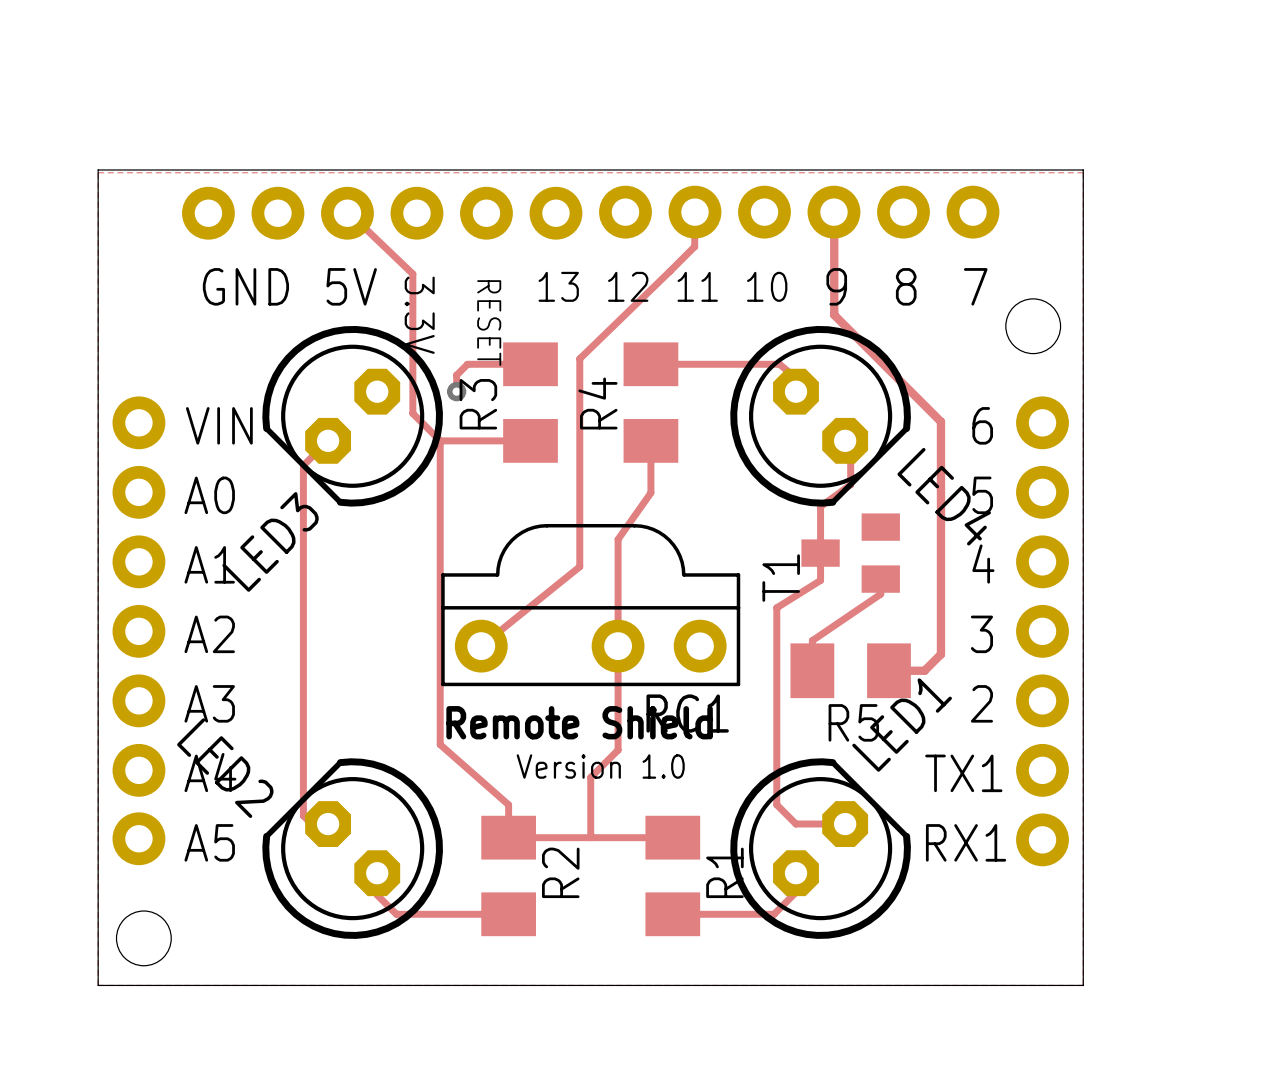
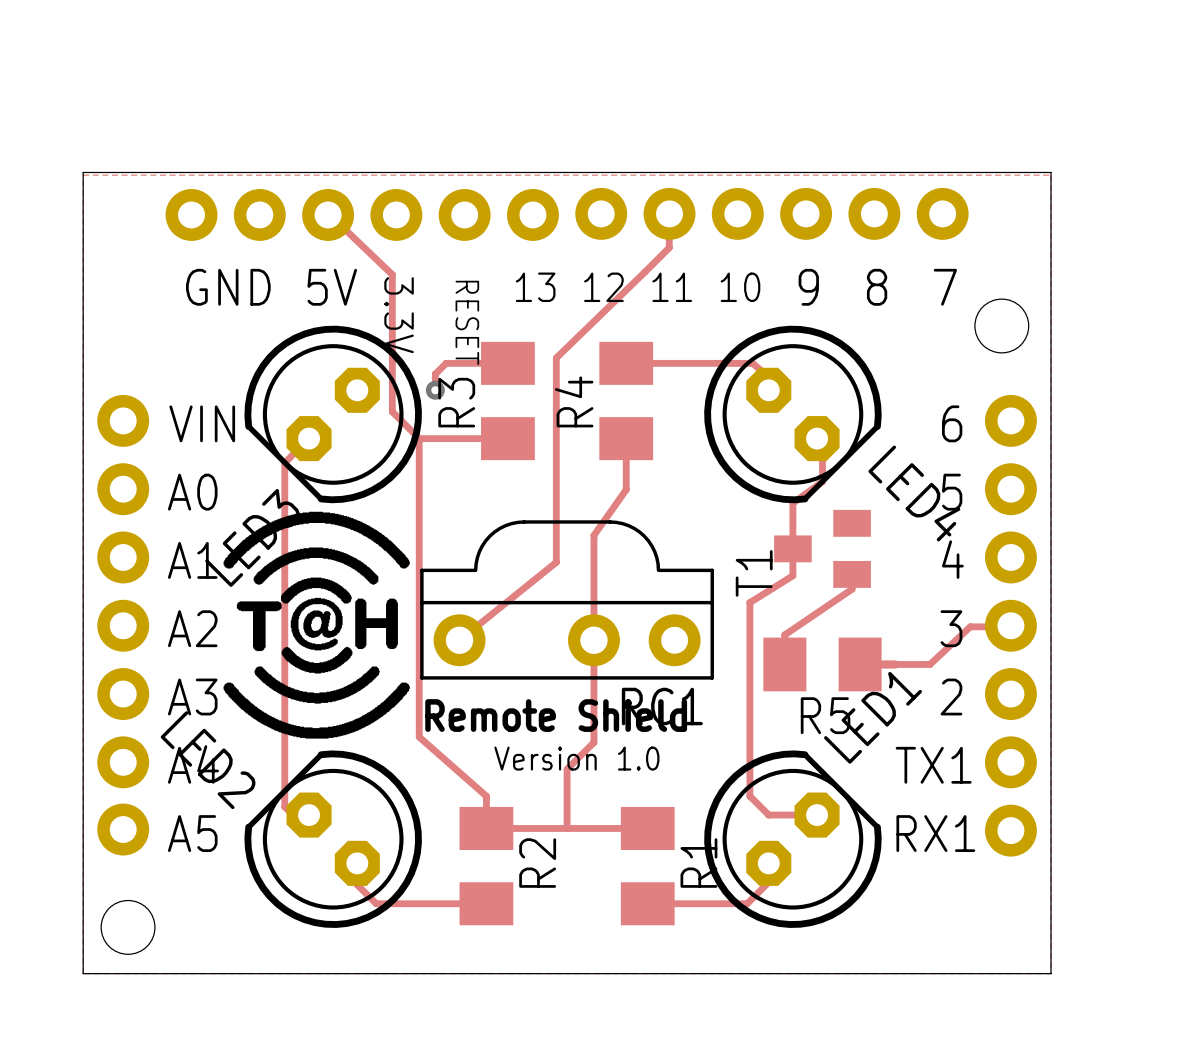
track: (834, 212) (834, 315) (940, 421) (940, 654) (924, 670) -> (1010, 625) (970, 626) (930, 664) (895, 664)
drawing: none -> [223, 511, 410, 739]

